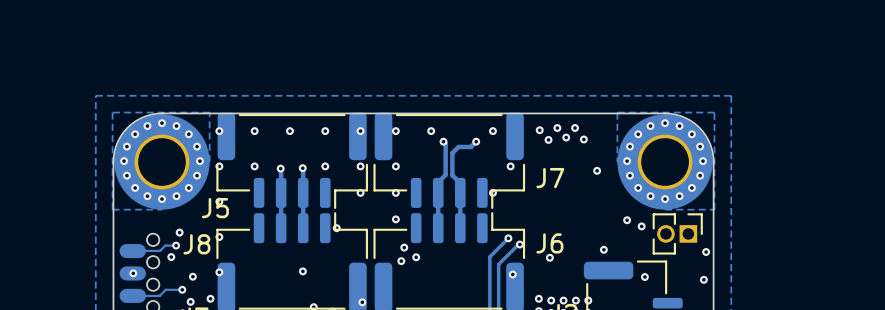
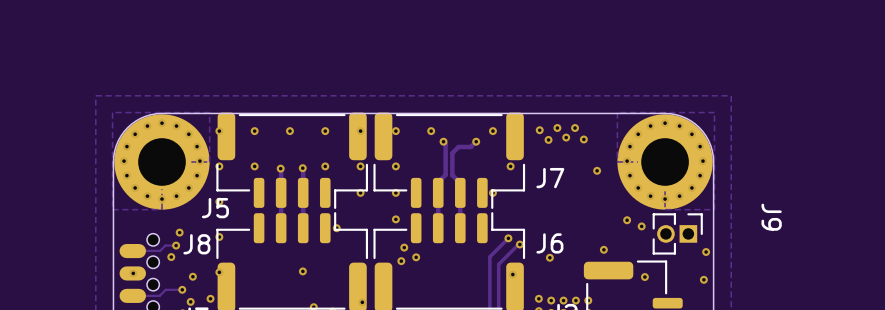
J9 name: none -> J9 (771, 217)

